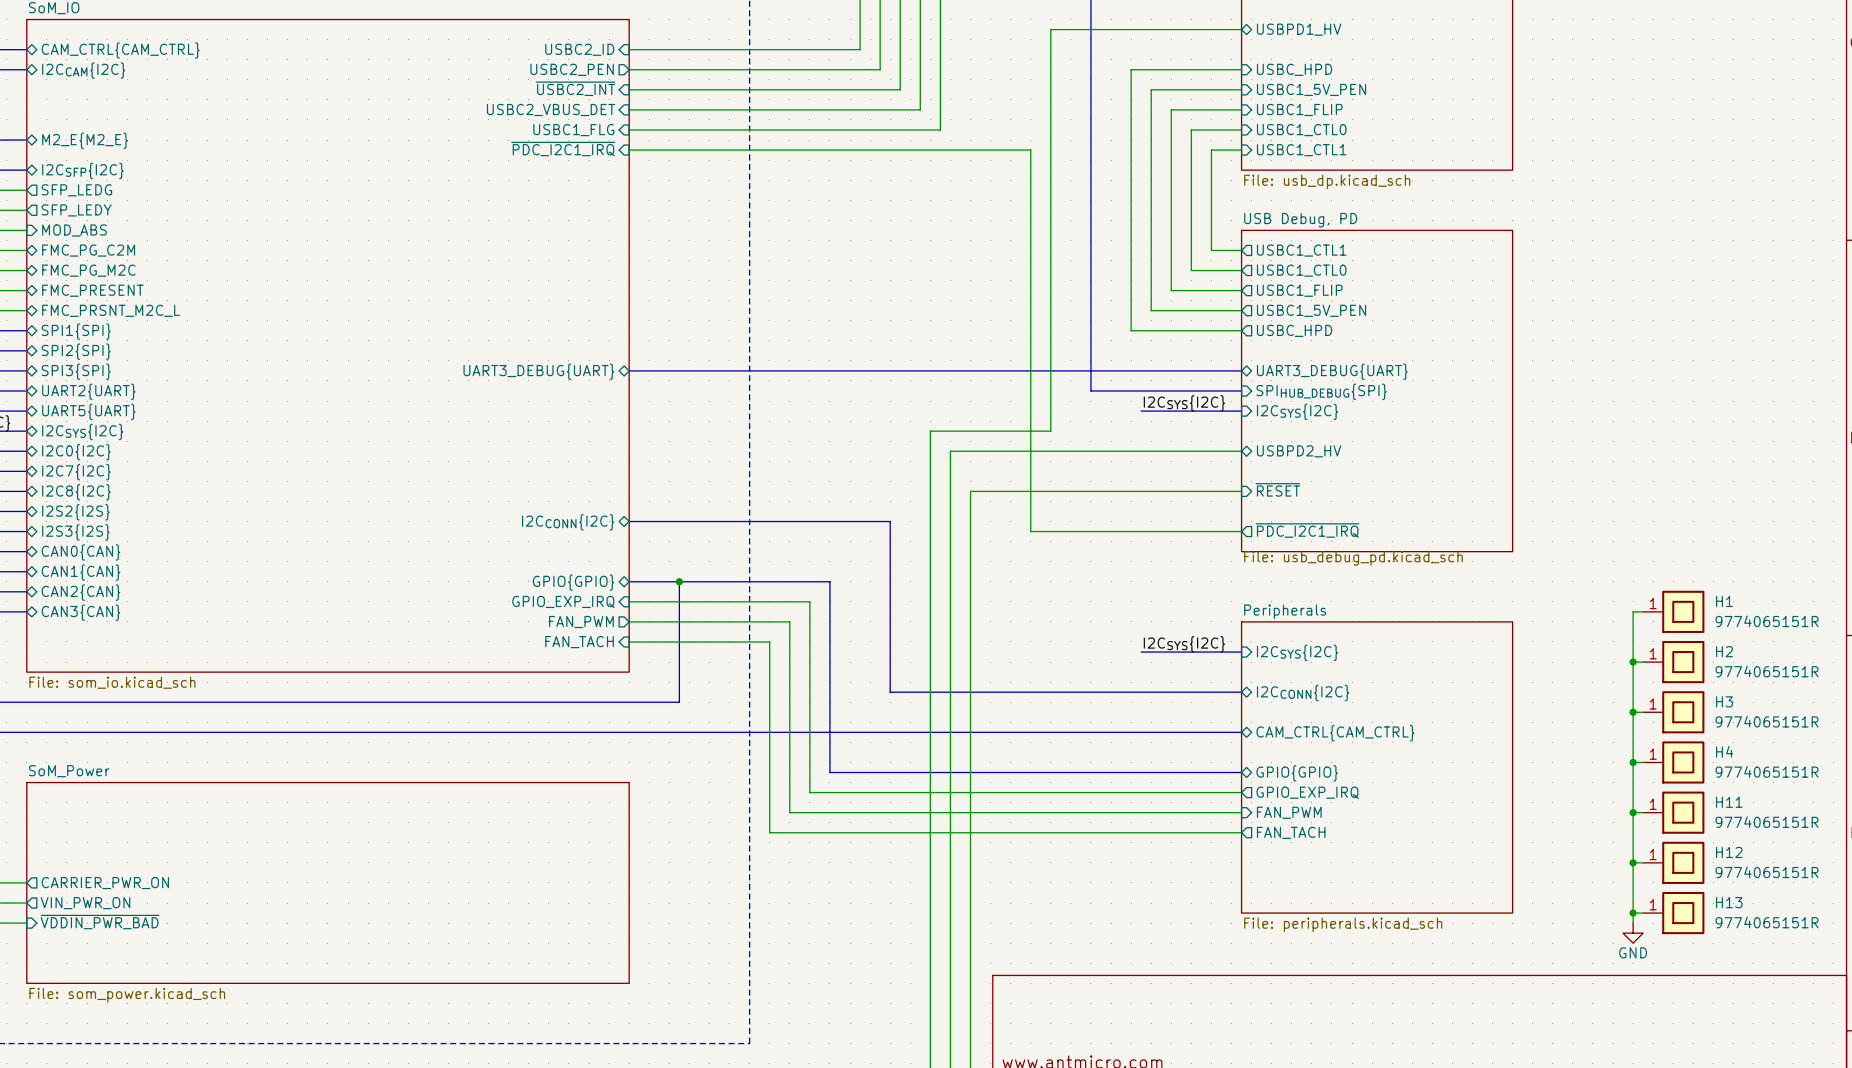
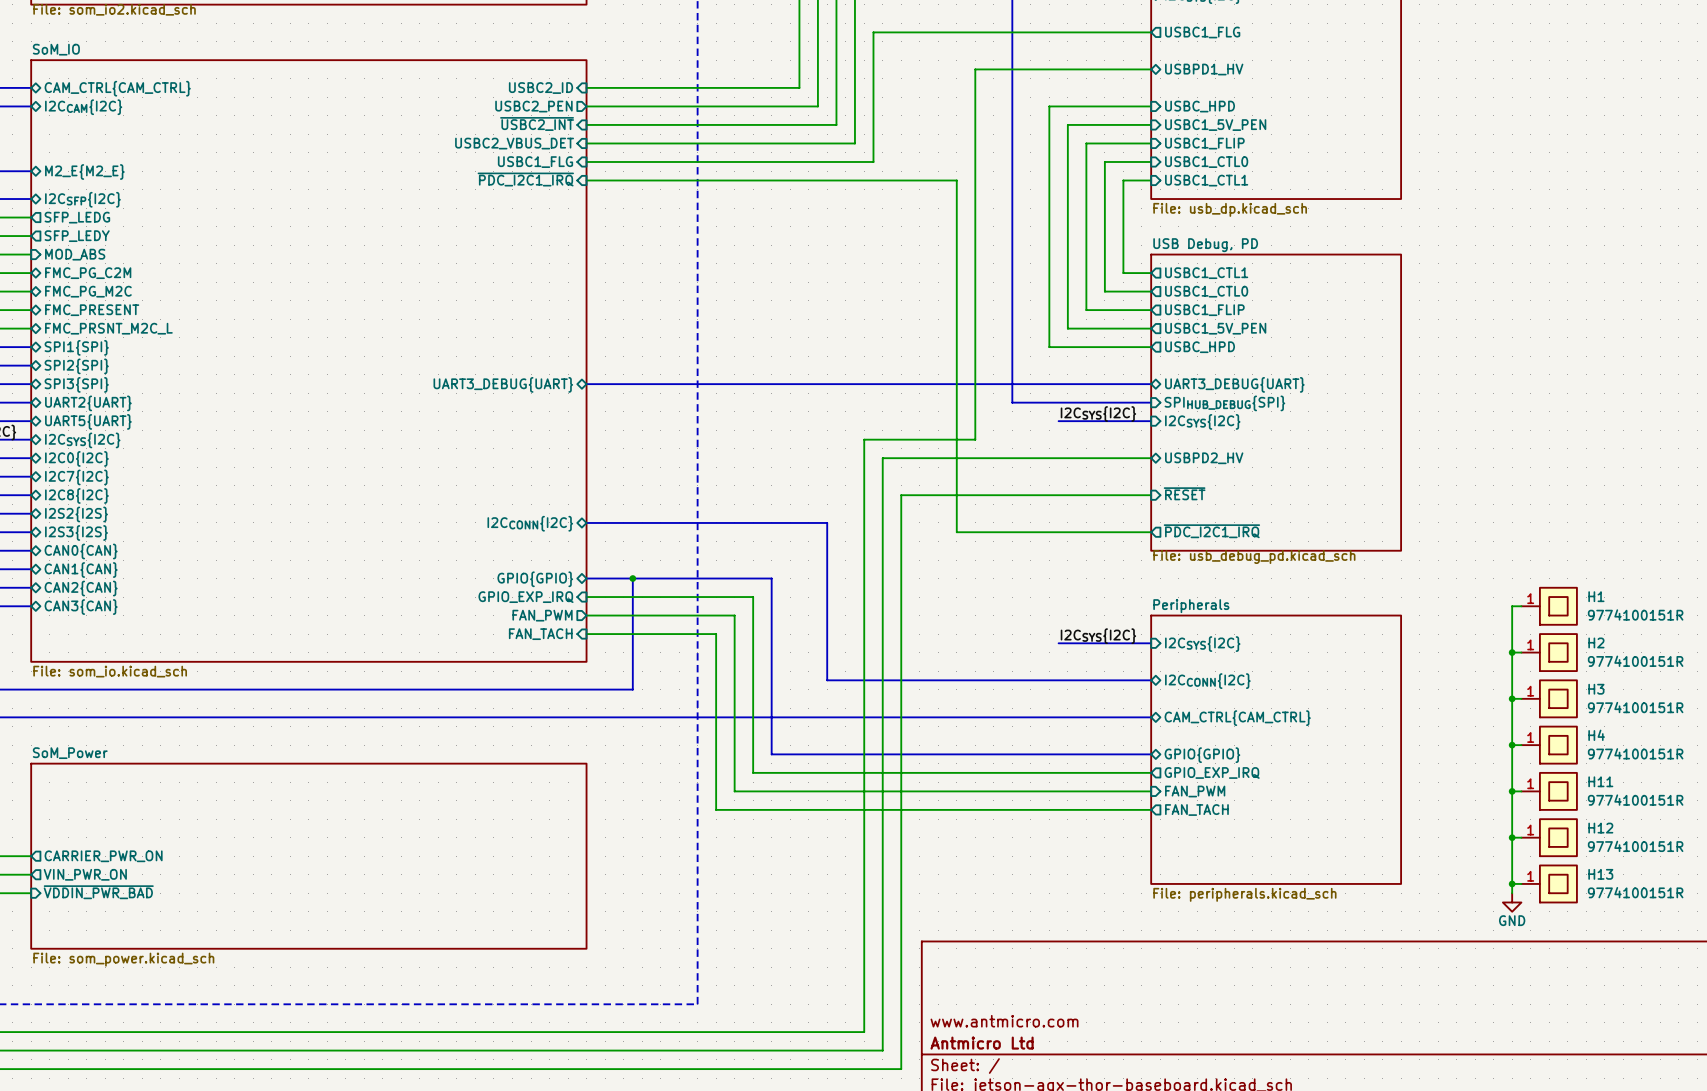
H1 text: 9774065151R (1767, 621) -> 9774100151R (1635, 614)
H2 text: 9774065151R (1767, 671) -> 9774100151R (1635, 661)
H3 text: 9774065151R (1767, 721) -> 9774100151R (1635, 707)
H4 text: 9774065151R (1767, 771) -> 9774100151R (1635, 753)
H11 text: 9774065151R (1767, 822) -> 9774100151R (1635, 800)
H12 text: 9774065151R (1767, 872) -> 9774100151R (1635, 846)
H13 text: 9774065151R (1767, 922) -> 9774100151R (1635, 892)

